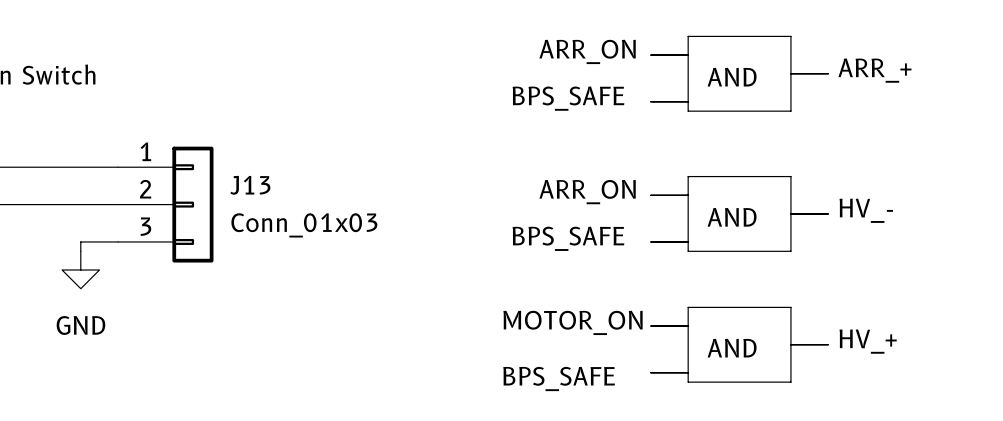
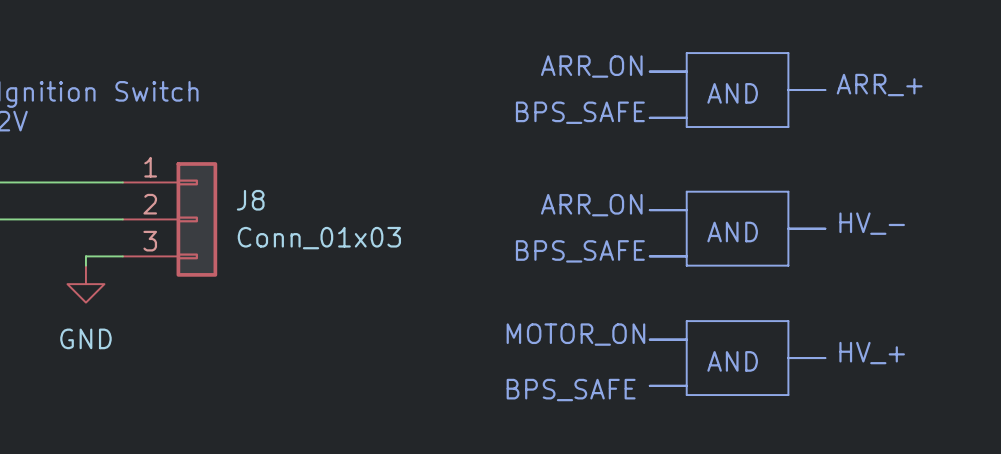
J13 name: J13 (250, 185) -> J8 (250, 200)

